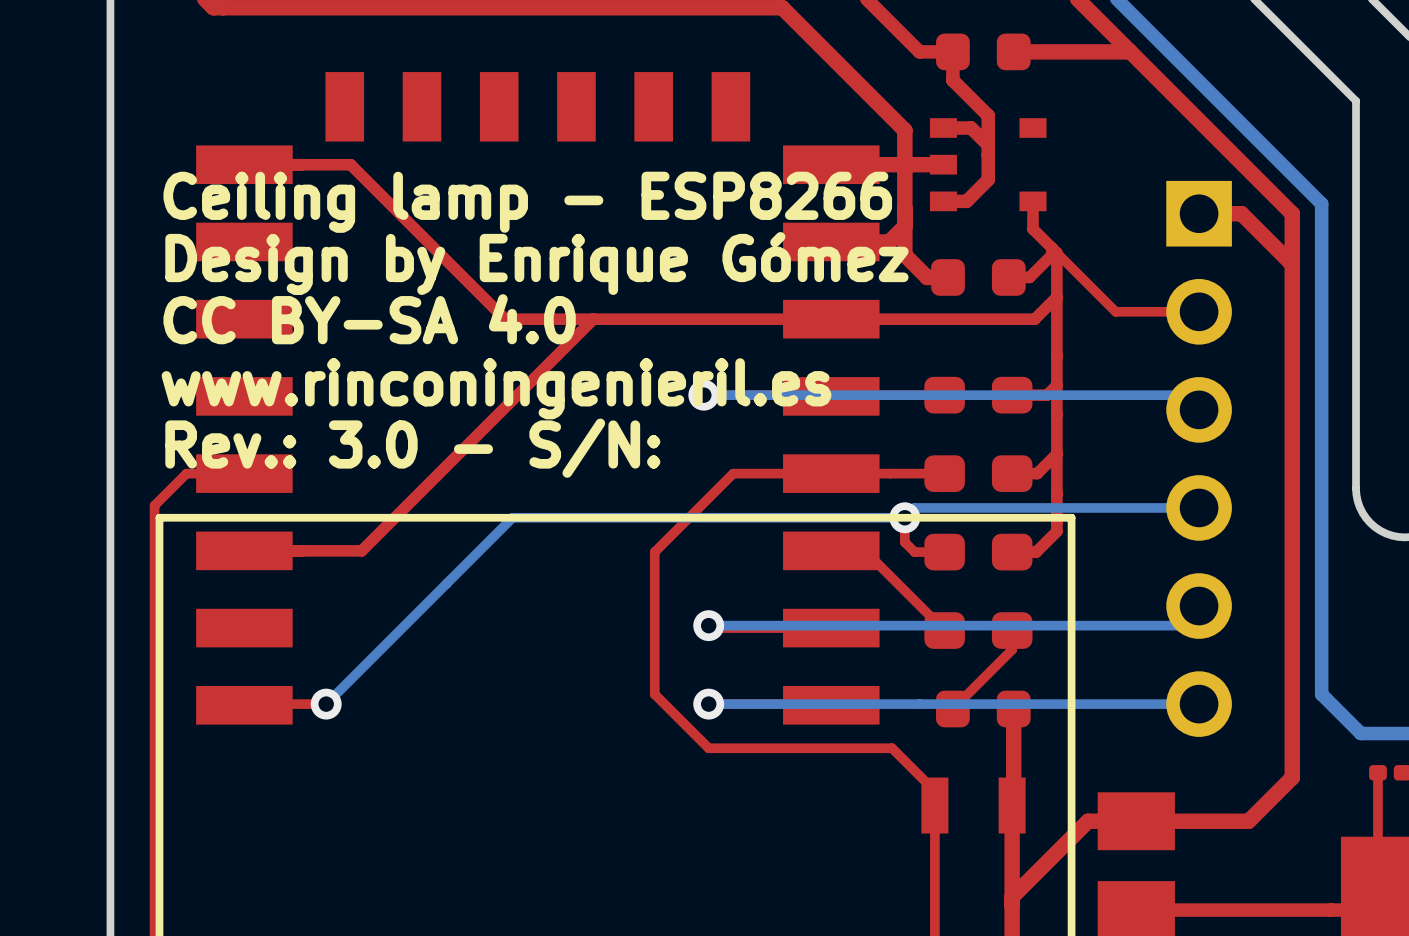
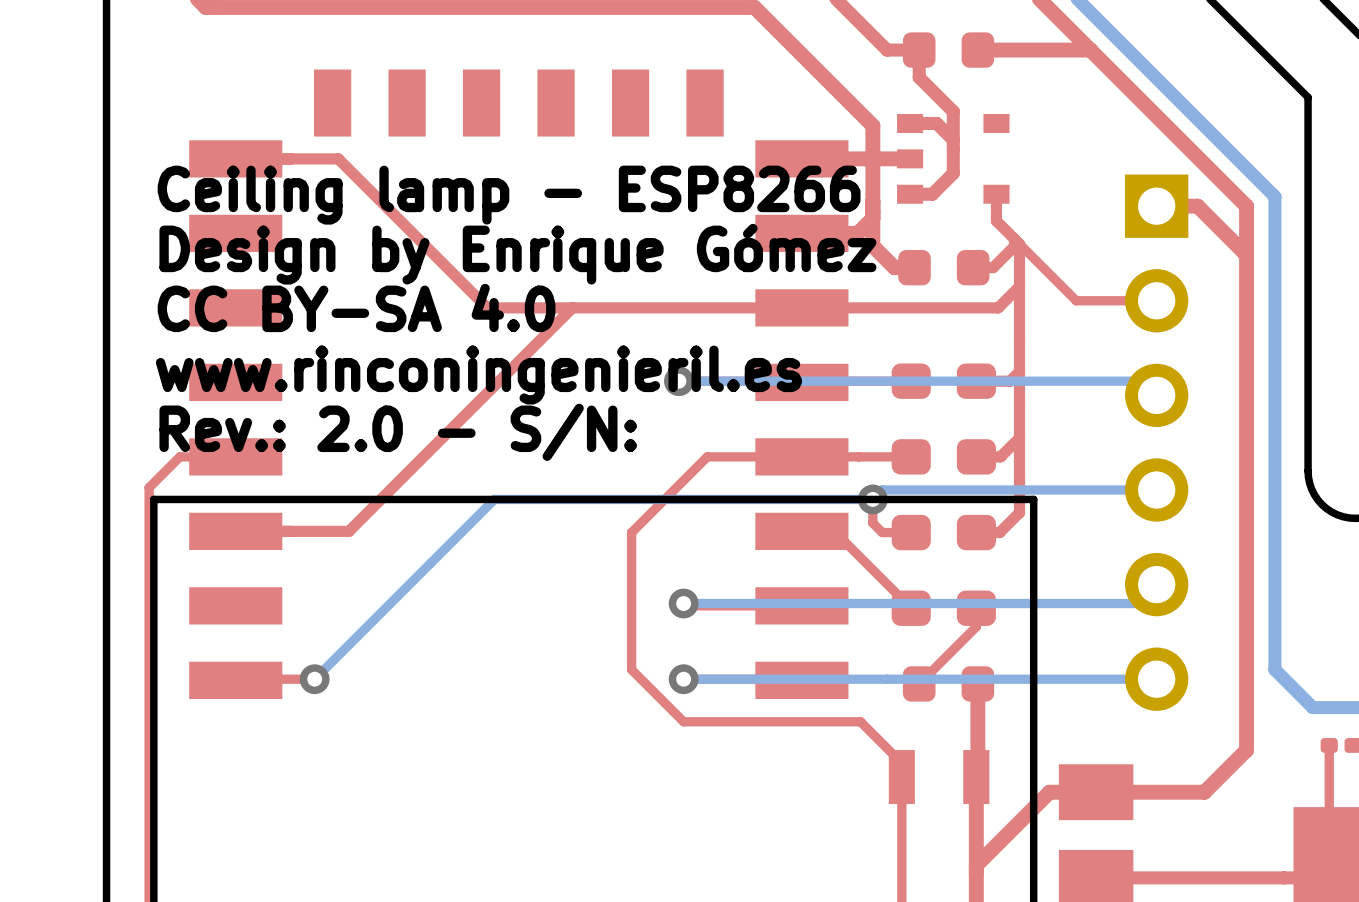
text: Rev.: 3.0 - S/N: (412, 448) -> Rev.: 2.0 - S/N: (398, 432)

